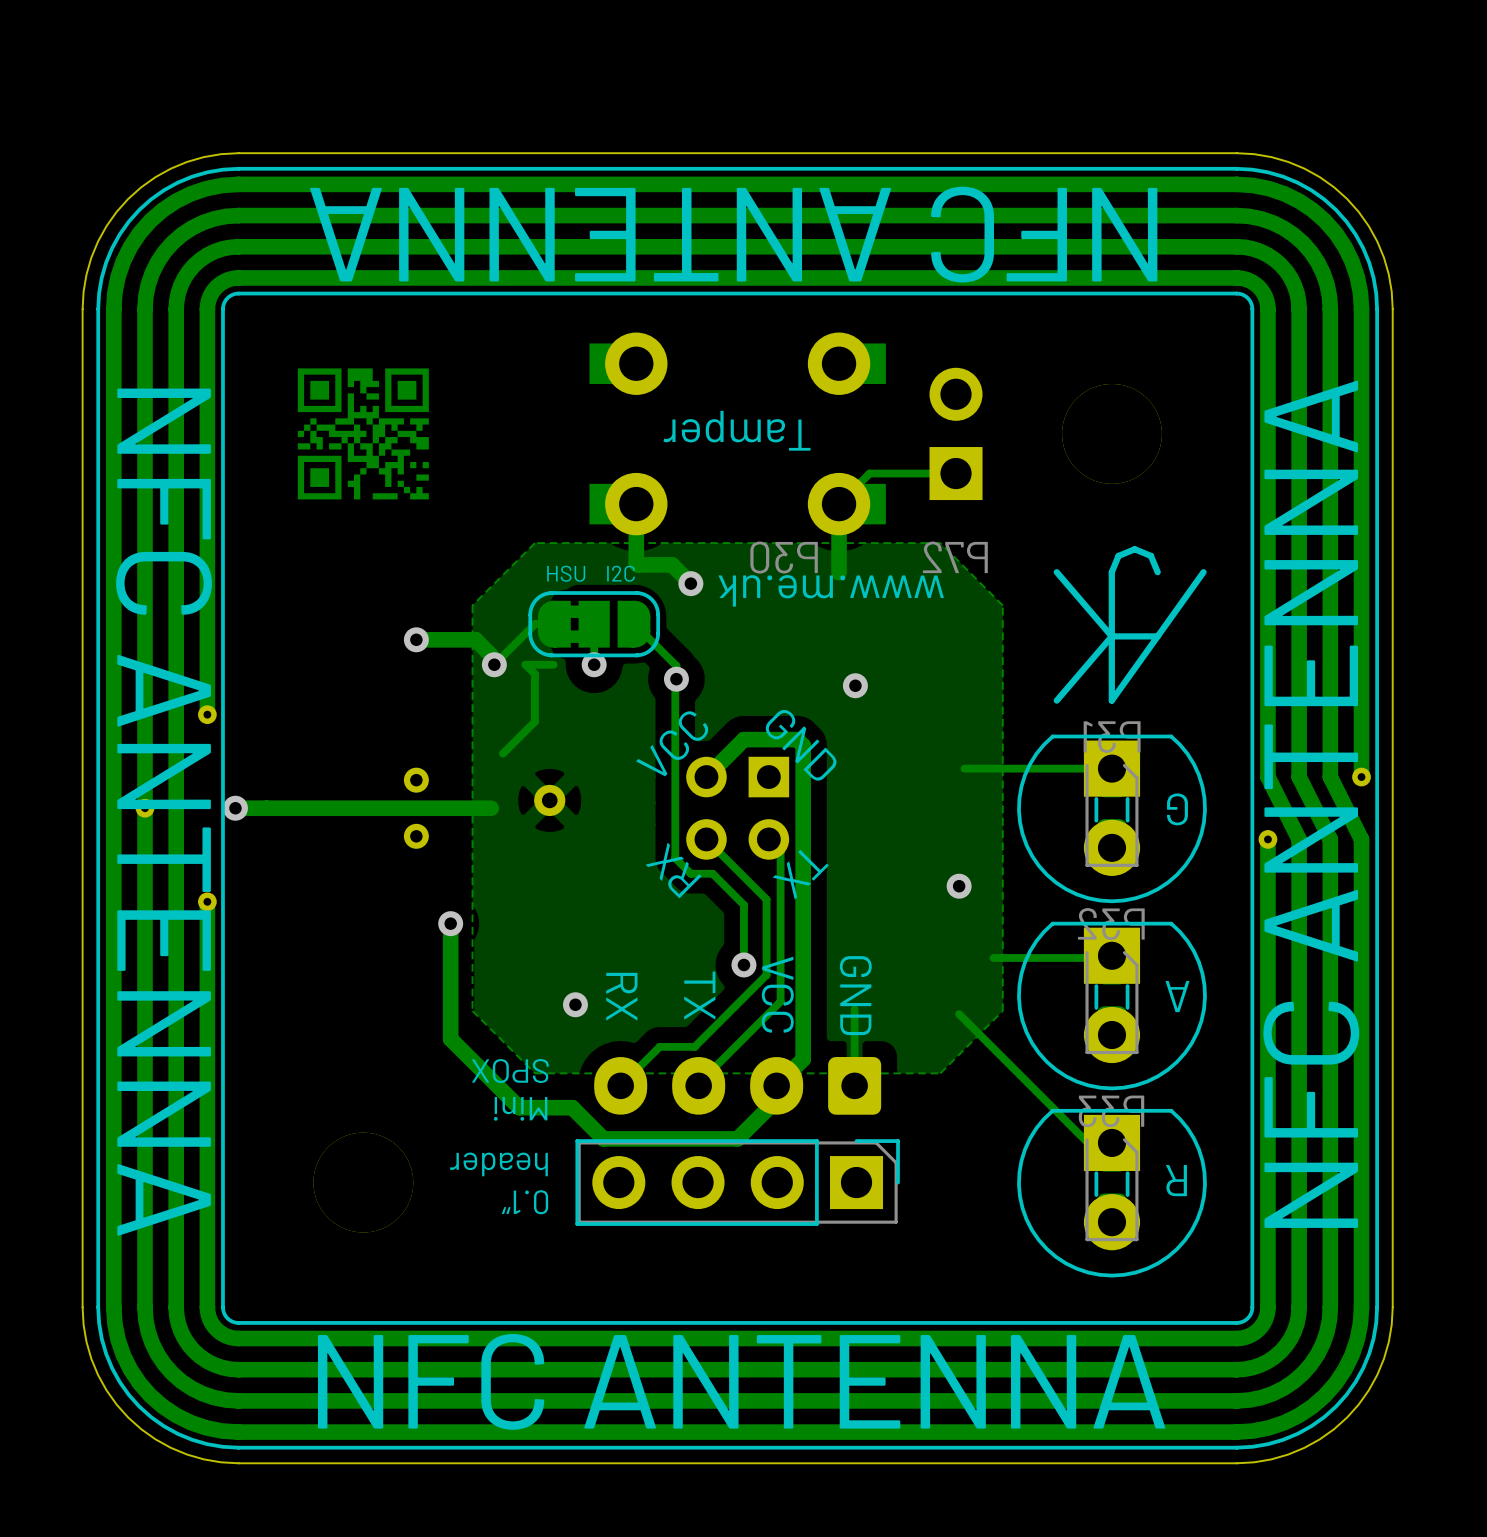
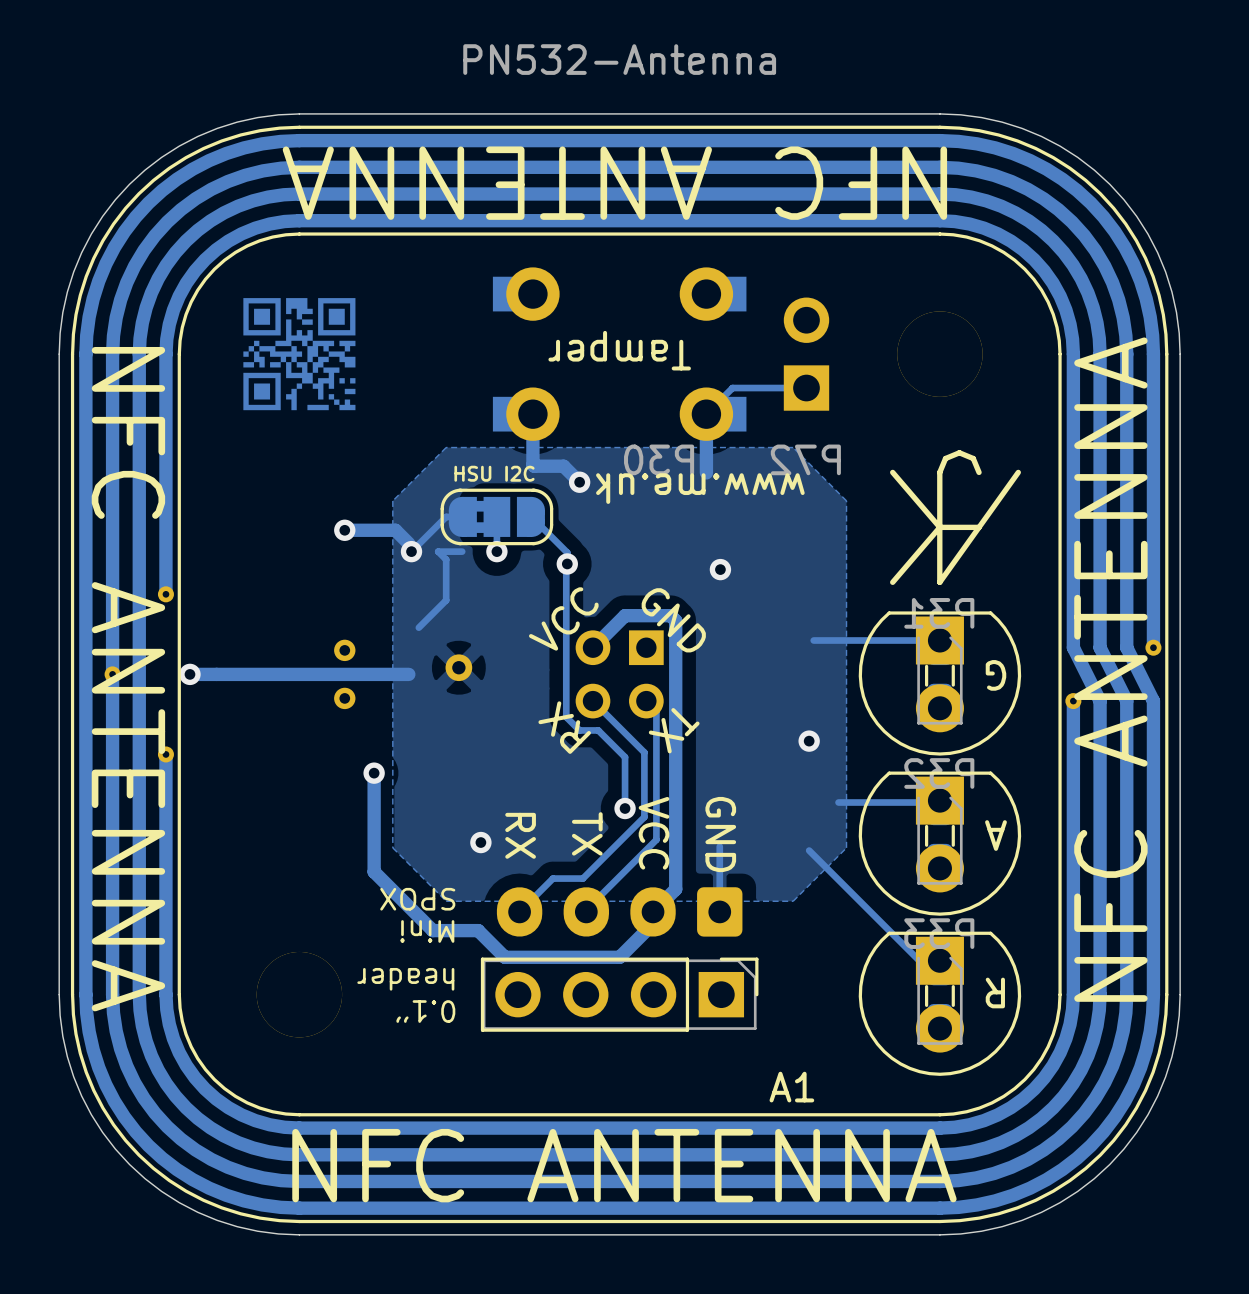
board edge: (363, 153) (238, 153) (203, 157) (187, 161) (155, 177) (128, 198) (106, 226) (98, 241) (86, 274) (82, 309) (82, 433) -> (299, 113) (257, 117) (217, 128) (179, 146) (145, 170) (129, 184) (102, 216) (81, 252) (67, 291) (62, 312) (59, 354)
board edge: (1111, 153) (1236, 153) (1271, 157) (1288, 161) (1319, 177) (1347, 198) (1368, 226) (1377, 241) (1388, 274) (1392, 309) (1392, 433) -> (939, 113) (981, 117) (1022, 128) (1060, 146) (1094, 170) (1109, 184) (1136, 216) (1157, 252) (1171, 291) (1176, 312) (1180, 354)
part: (737, 808) -> none
A1: none -> PN532-Antenna (619, 674)
board edge: (82, 1182) (82, 1307) (86, 1342) (98, 1374) (106, 1390) (128, 1417) (155, 1439) (187, 1454) (203, 1459) (238, 1463) (363, 1463) -> (59, 994) (62, 1036) (67, 1056) (81, 1096) (102, 1132) (129, 1164) (145, 1178) (179, 1202) (217, 1220) (257, 1231) (299, 1234)
board edge: (1392, 1182) (1392, 1307) (1388, 1342) (1377, 1374) (1368, 1390) (1347, 1417) (1319, 1439) (1288, 1454) (1271, 1459) (1236, 1463) (1111, 1463) -> (1180, 994) (1176, 1036) (1171, 1056) (1157, 1096) (1136, 1132) (1109, 1164) (1094, 1178) (1060, 1202) (1022, 1220) (981, 1231) (939, 1234)

